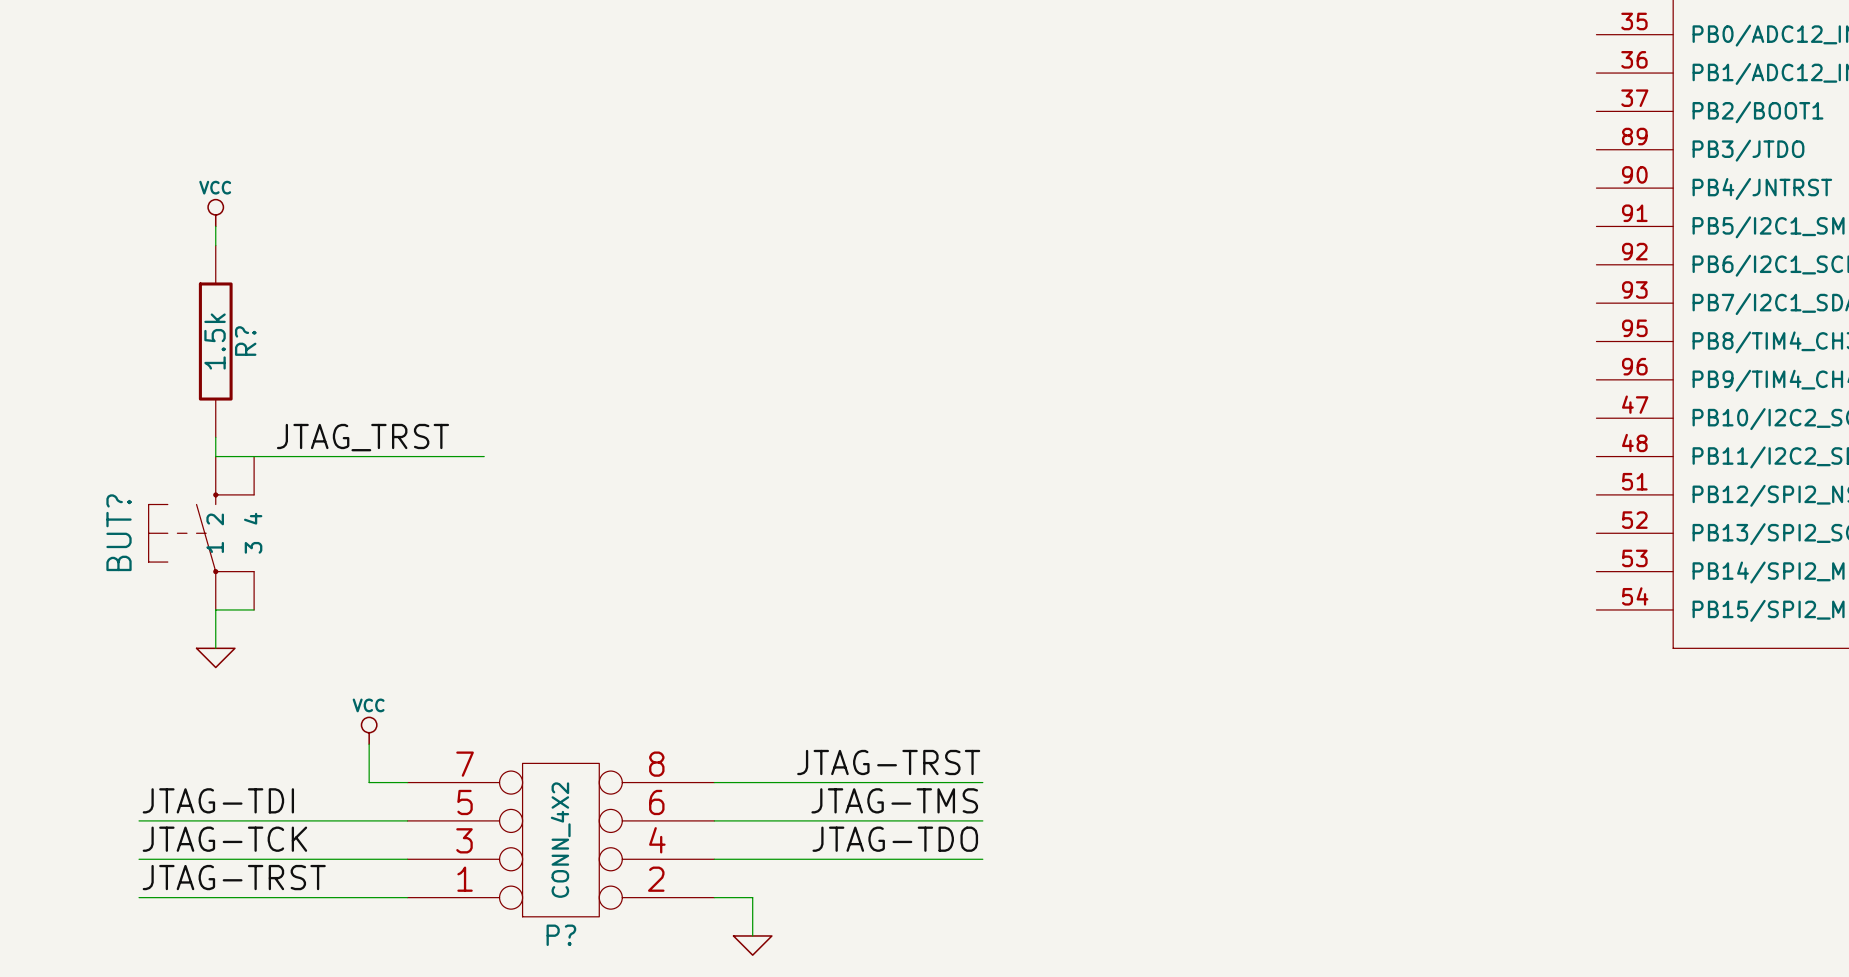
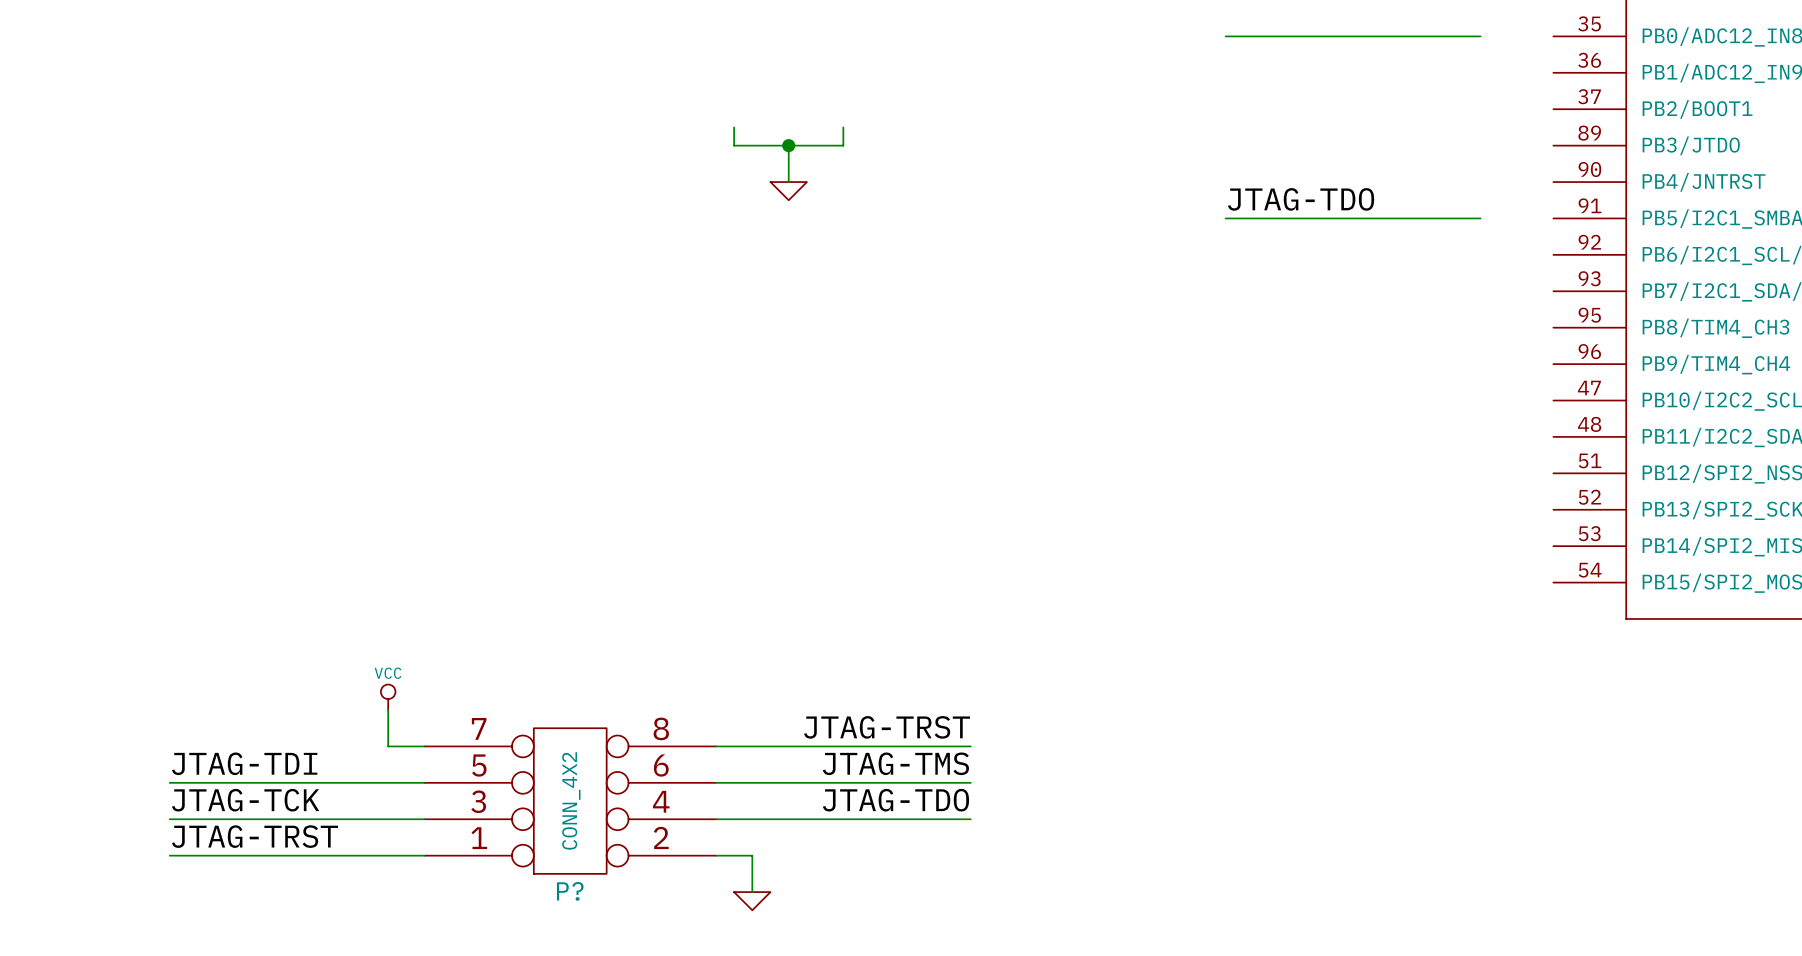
wire: none -> (1225, 36) (1480, 36)
wire: none -> (734, 127) (734, 145) (843, 145) (843, 127)
wire: none -> (788, 145) (788, 182)
junction: none -> (788, 145)
power symbol: none -> (788, 191)
label: none -> JTAG-TDO (1301, 199)
power symbol: VCC (215, 213) -> none
wire: (215, 226) (215, 245) -> none
wire: none -> (1225, 218) (1480, 218)
R?: 1.5k (215, 341) -> none
wire: (215, 437) (215, 456) (484, 456) -> none
label: JTAG_TRST (363, 437) -> none
BUT?: (201, 533) -> none
wire: (254, 609) (215, 609) (215, 648) -> none
power symbol: (215, 657) -> none

